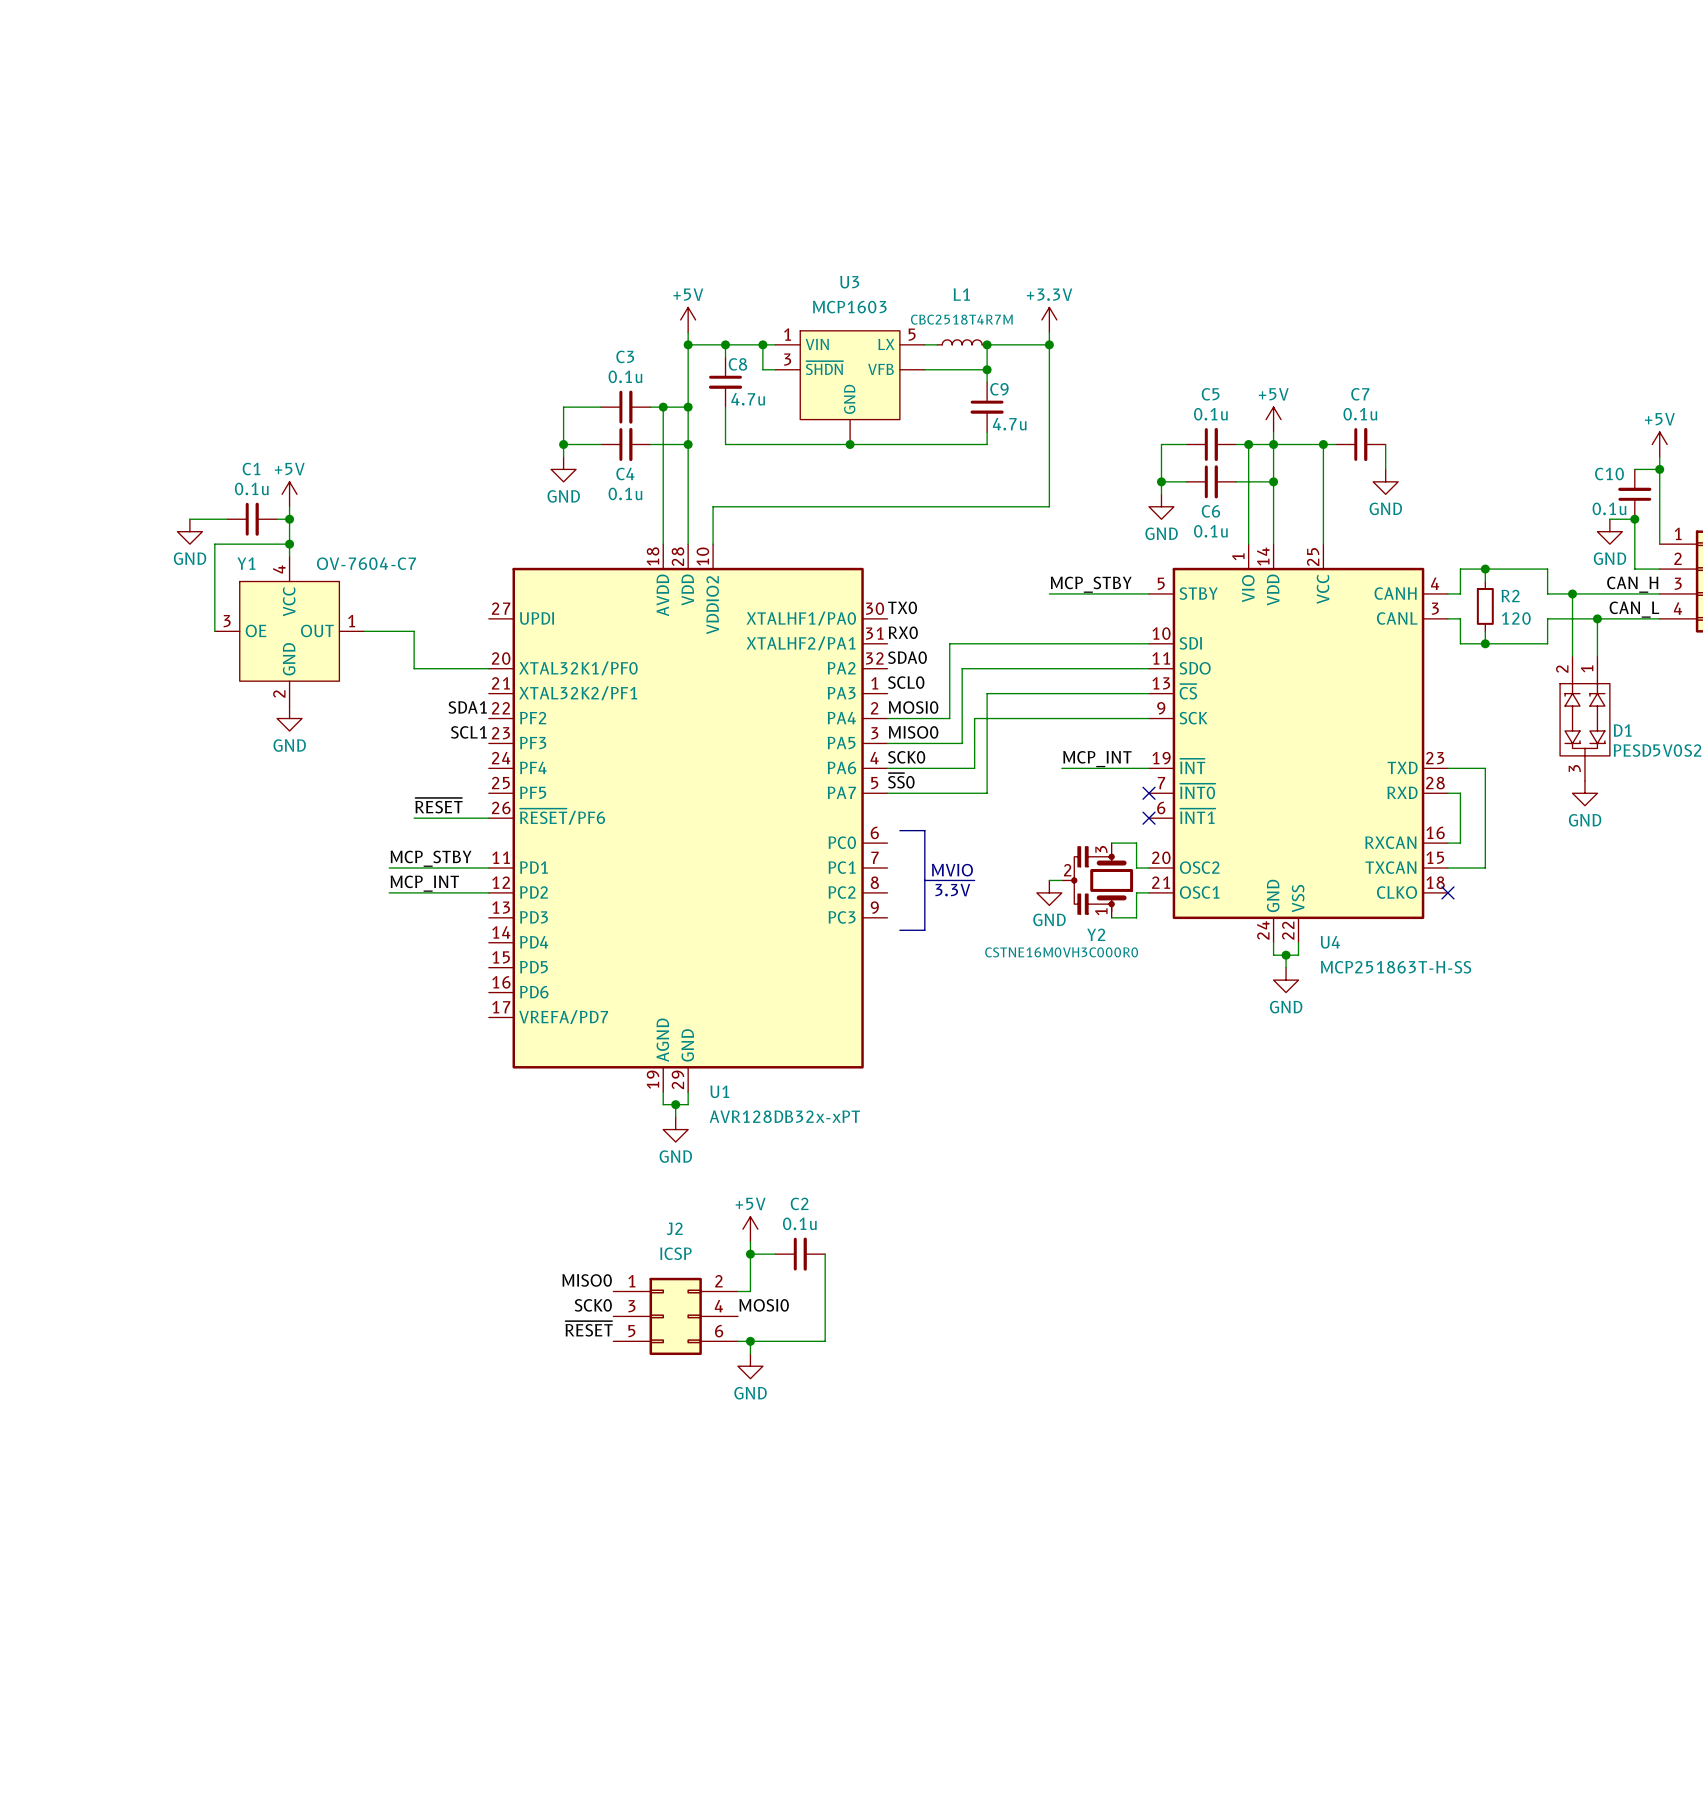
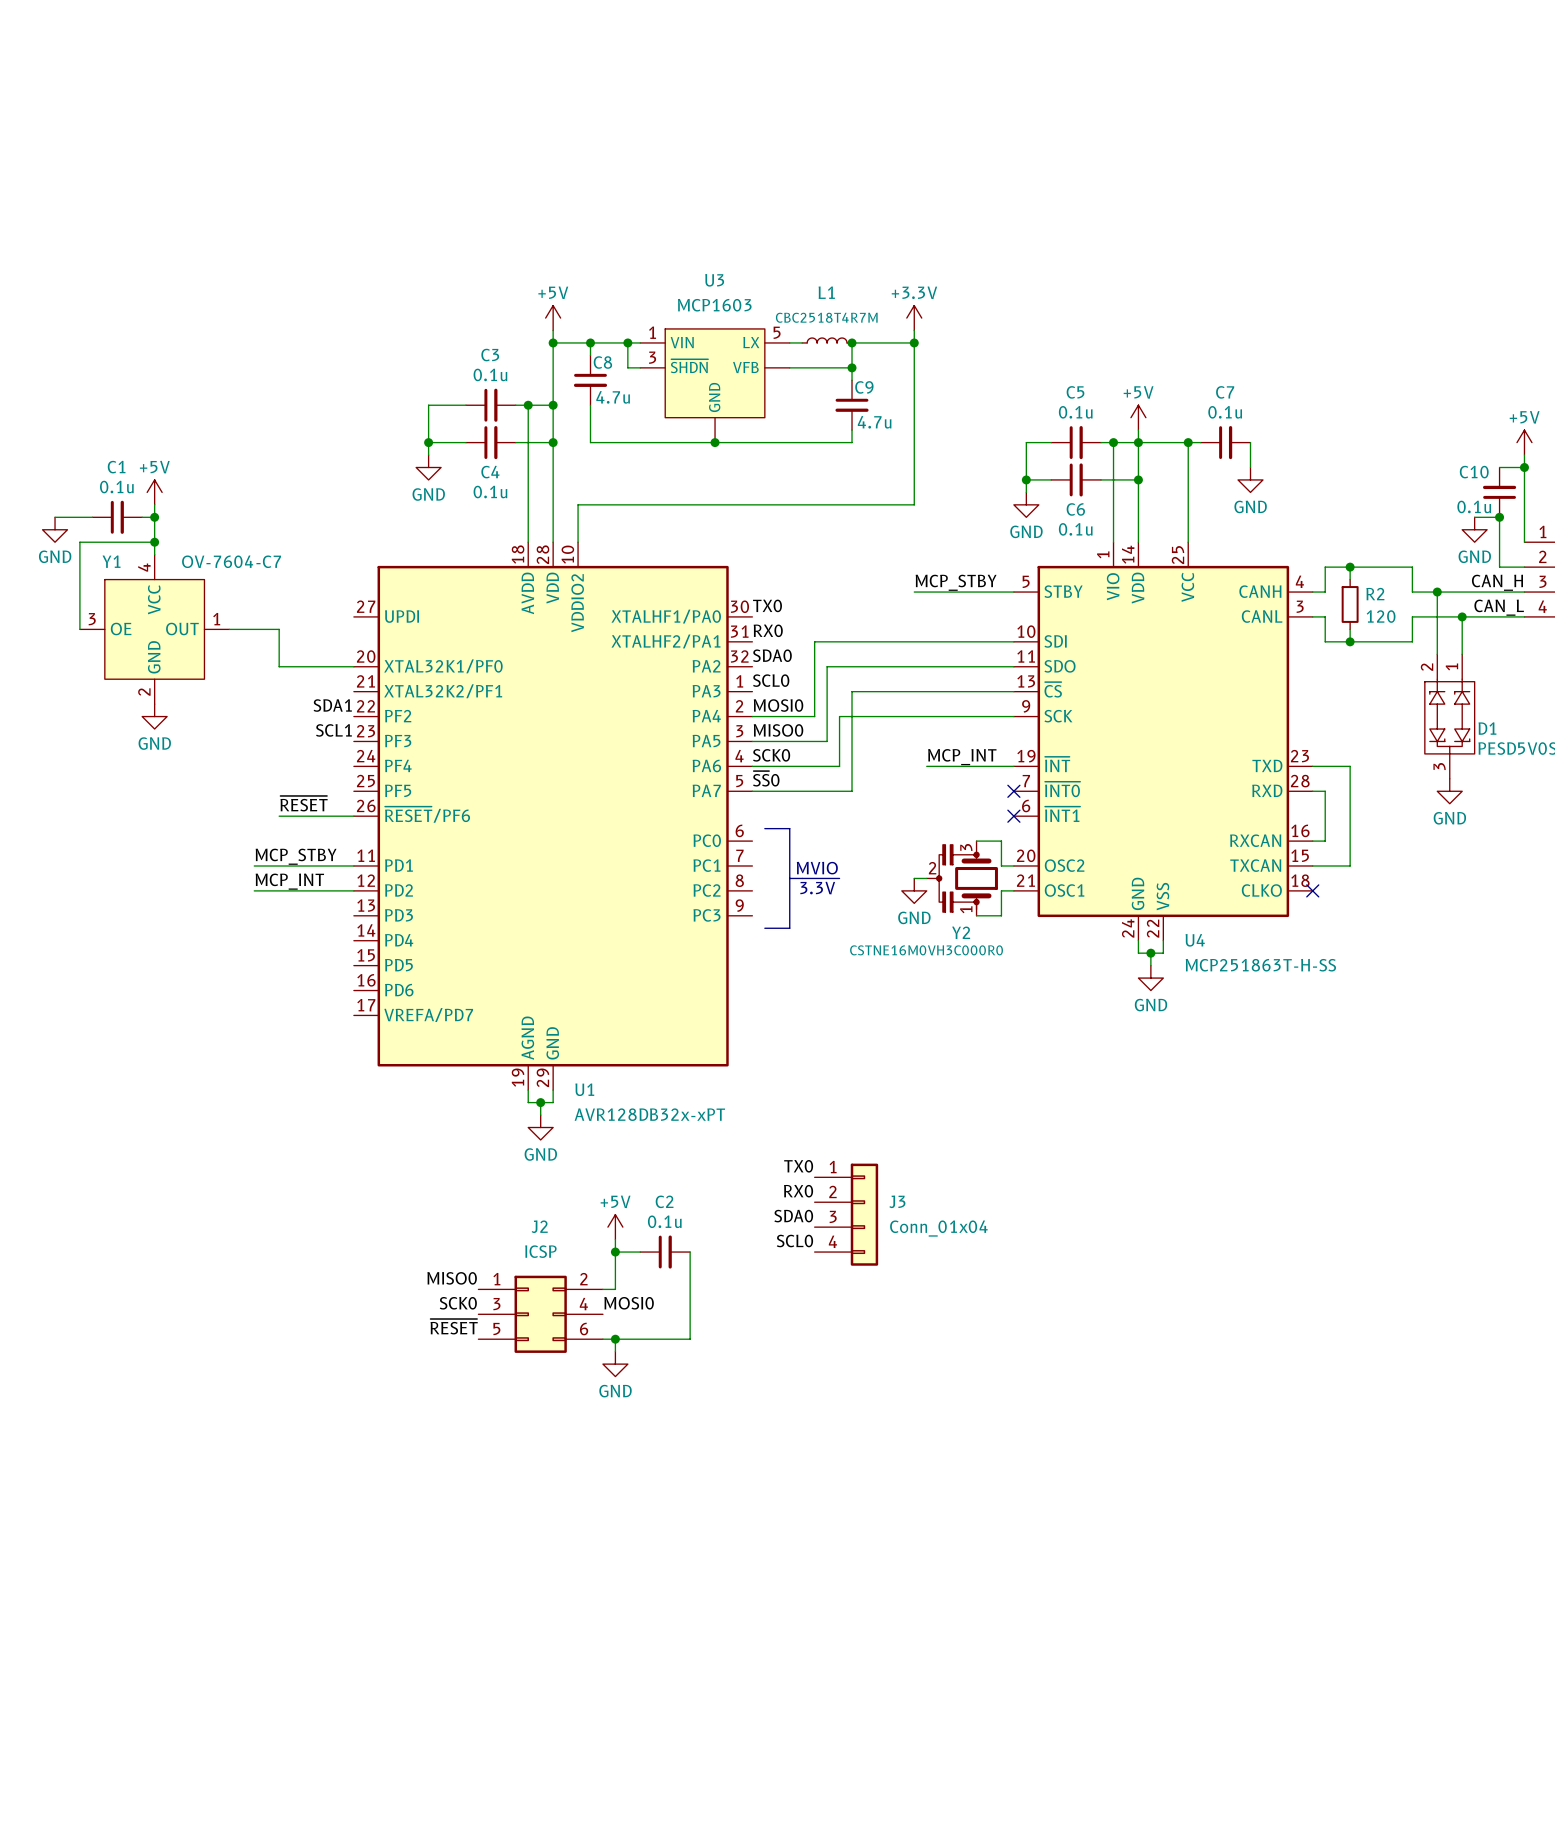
label: none -> TX0 (798, 1166)
label: none -> RX0 (798, 1191)
J3: none -> Conn_01x04 (846, 1214)
label: none -> SDA0 (793, 1216)
label: none -> SCL0 (794, 1240)

